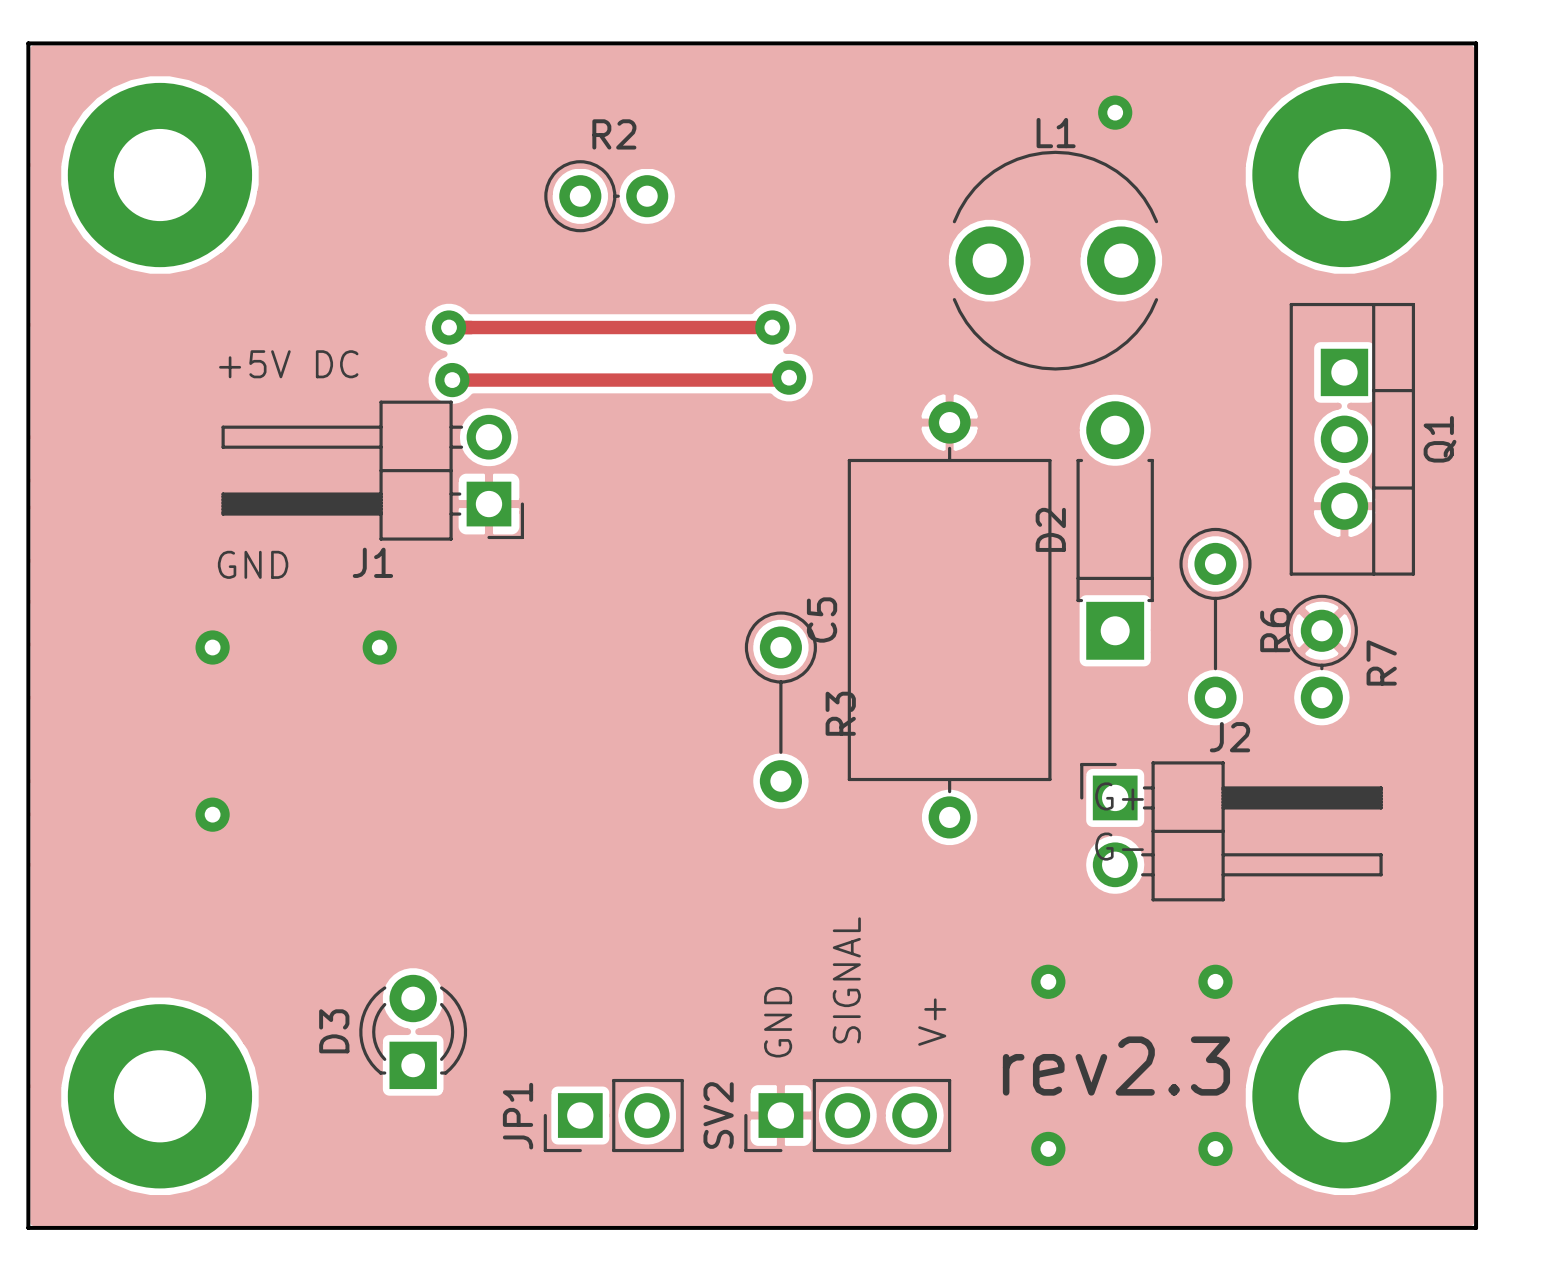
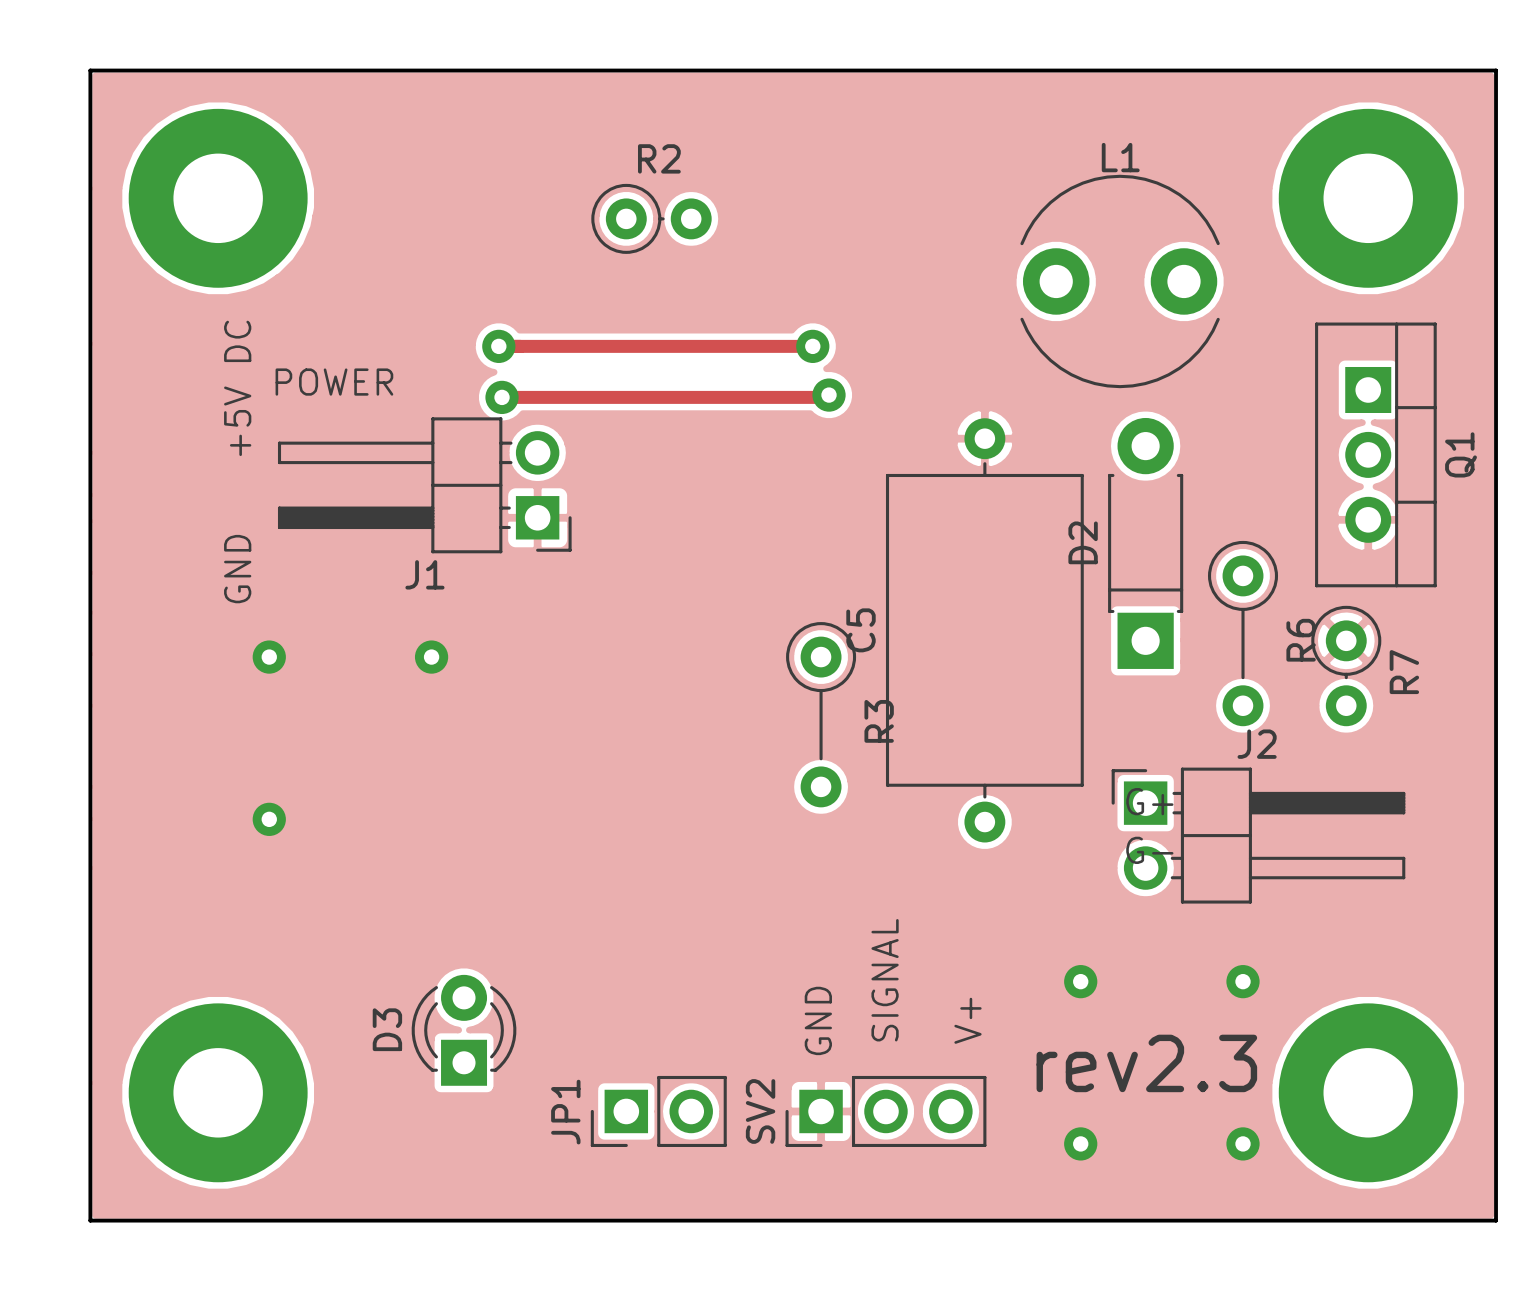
via: (1115, 112) -> none
L1 position: (1055, 260) -> (1120, 281)
text: +5V DC (288, 364) -> POWER (334, 382)
text: none -> +5V DC (237, 388)
text rotation: 0° (253, 564) -> 90° counterclockwise (237, 569)

